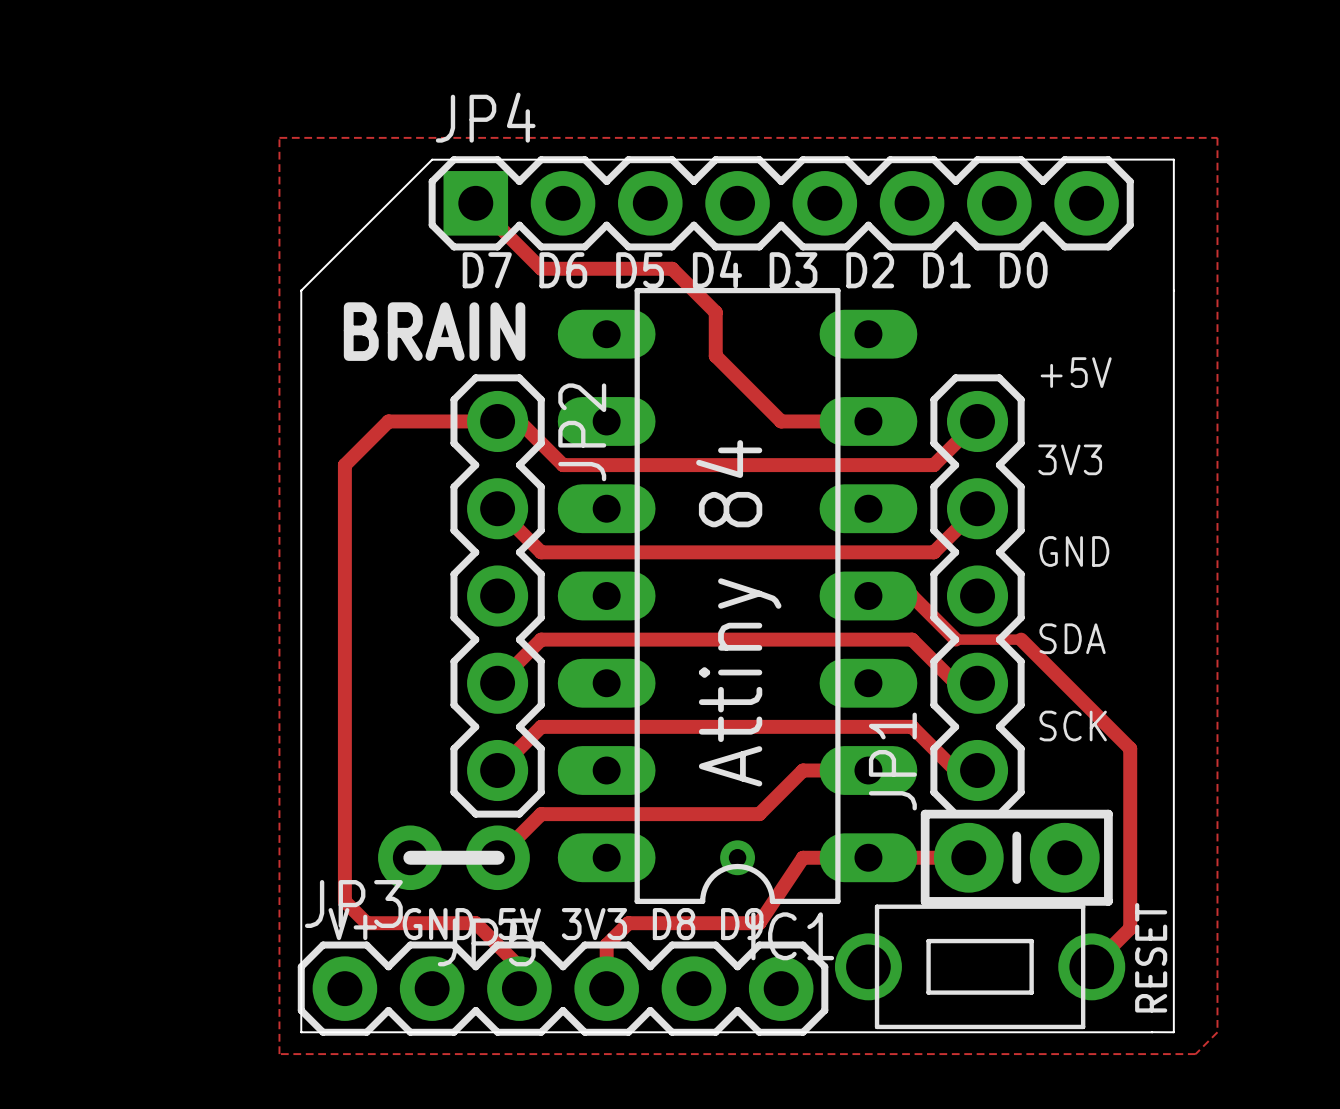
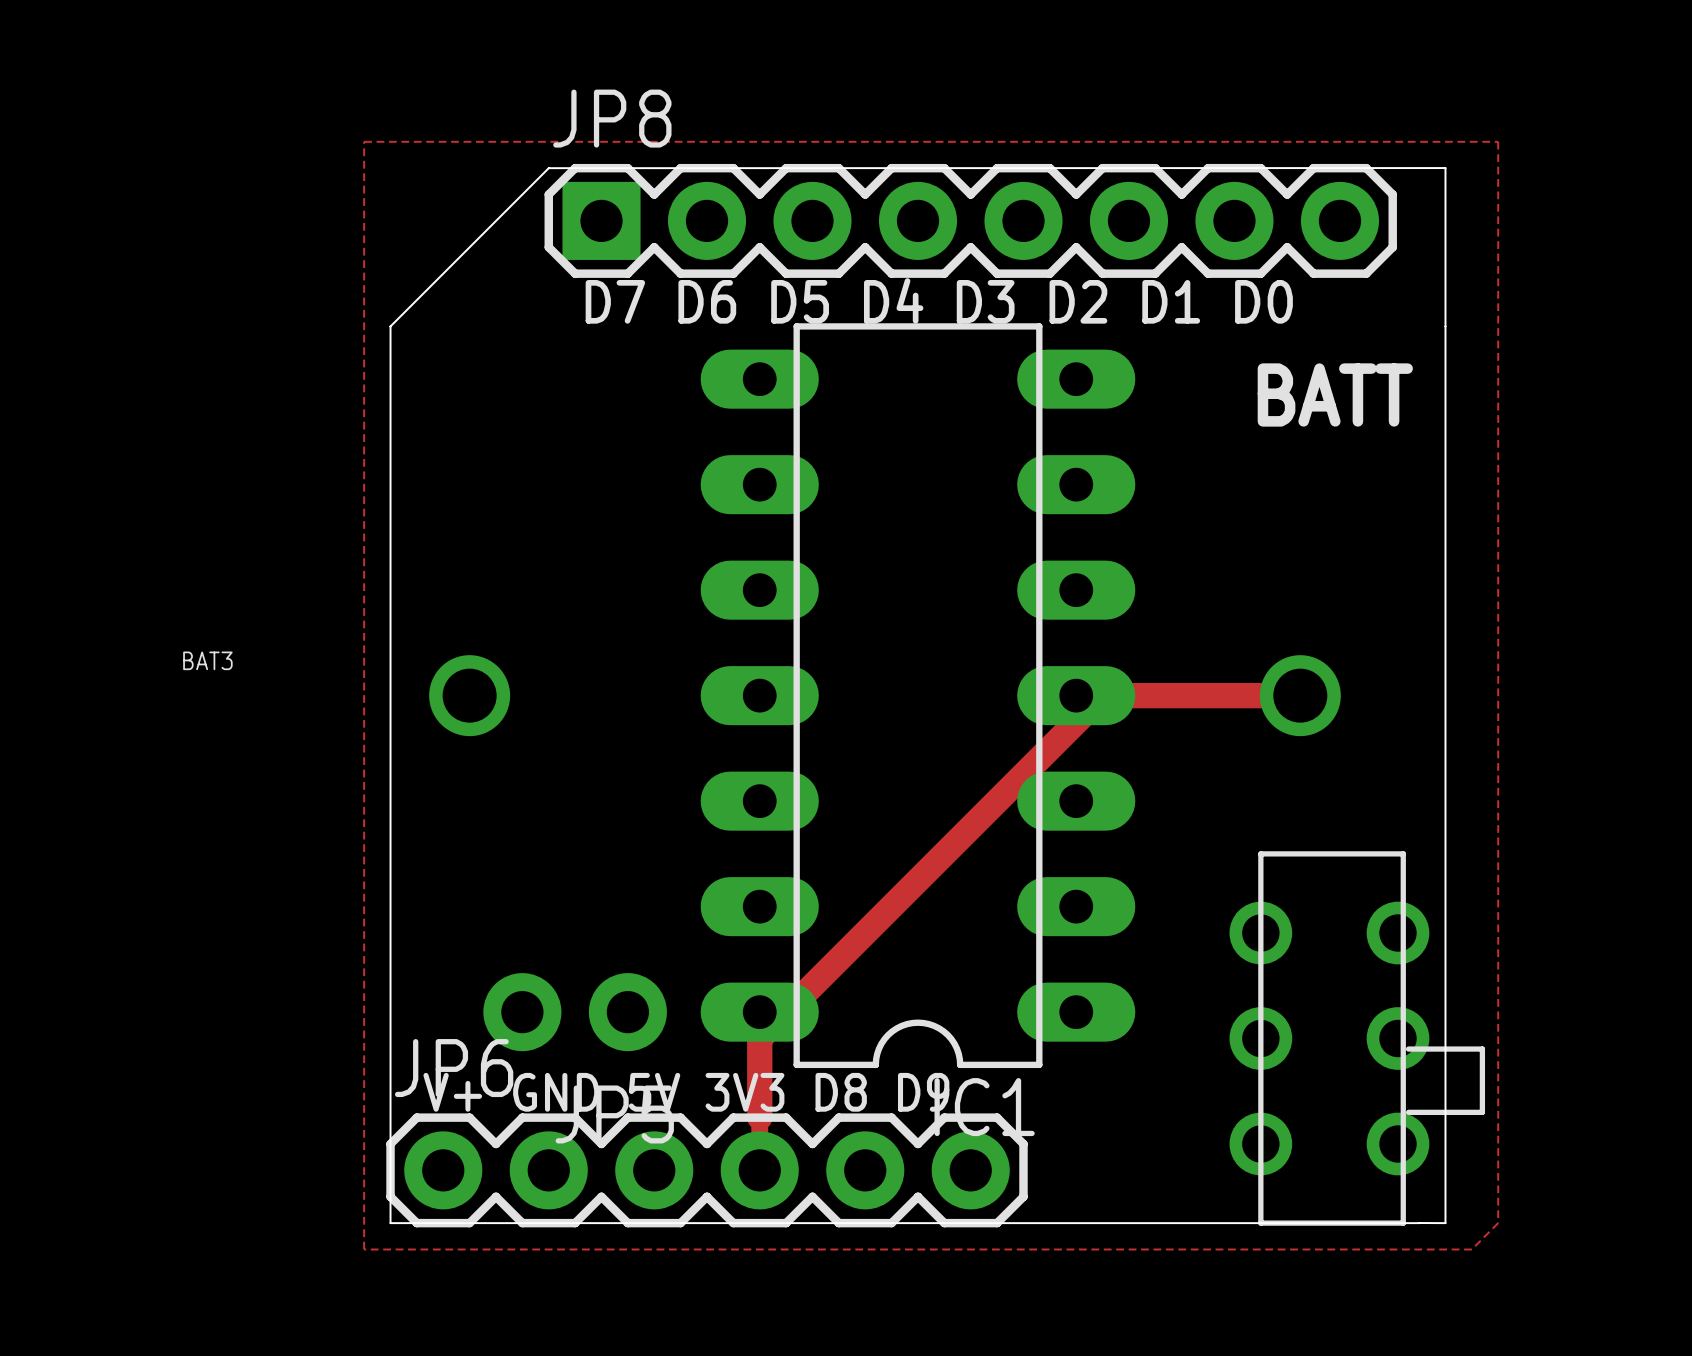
JP4 name: JP4 (485, 117) -> JP8 (612, 118)
track: (475, 203) (541, 268) (672, 268) (715, 312) (715, 356) (781, 421) (868, 421) -> none
text: BRAIN (434, 331) -> none
text: none -> BATT (1335, 394)
text: +5V (1076, 372) -> none
track: (977, 421) (933, 465) (563, 465) (519, 421) (388, 421) (344, 465) (344, 901) (366, 923) (475, 923) (519, 966) (519, 988) -> none
text: 3V3 (1070, 459) -> none
track: (497, 508) (541, 552) (933, 552) (977, 508) -> none
text: GND (1074, 551) -> none
JP2: (497, 595) -> none
BAT3: none -> (884, 695)
track: (912, 595) (955, 639) (1021, 639) (1130, 748) (1130, 928) (1091, 966) -> (1128, 695) (1300, 695)
JP1: (977, 595) -> none
text: Attiny 84 (738, 613) -> none
text: SDA (1072, 638) -> none
track: (497, 683) (541, 639) (912, 639) (955, 683) (977, 683) -> none
text: SCK (1073, 726) -> none
track: (497, 770) (541, 726) (912, 726) (955, 770) (977, 770) -> none
track: (868, 770) (803, 770) (759, 814) (541, 814) (497, 857) -> none
line: (410, 857) (497, 857) -> none
via: (737, 857) -> none
track: (968, 857) (803, 857) (759, 923) (628, 923) (606, 945) -> (1102, 695) (759, 1038) (759, 1117)
part: (1016, 857) -> none
part: none -> (1357, 1038)
JP3 name: JP3 (353, 904) -> JP6 (454, 1068)
text: RESET (1151, 957) -> none
part: (980, 966) -> none

